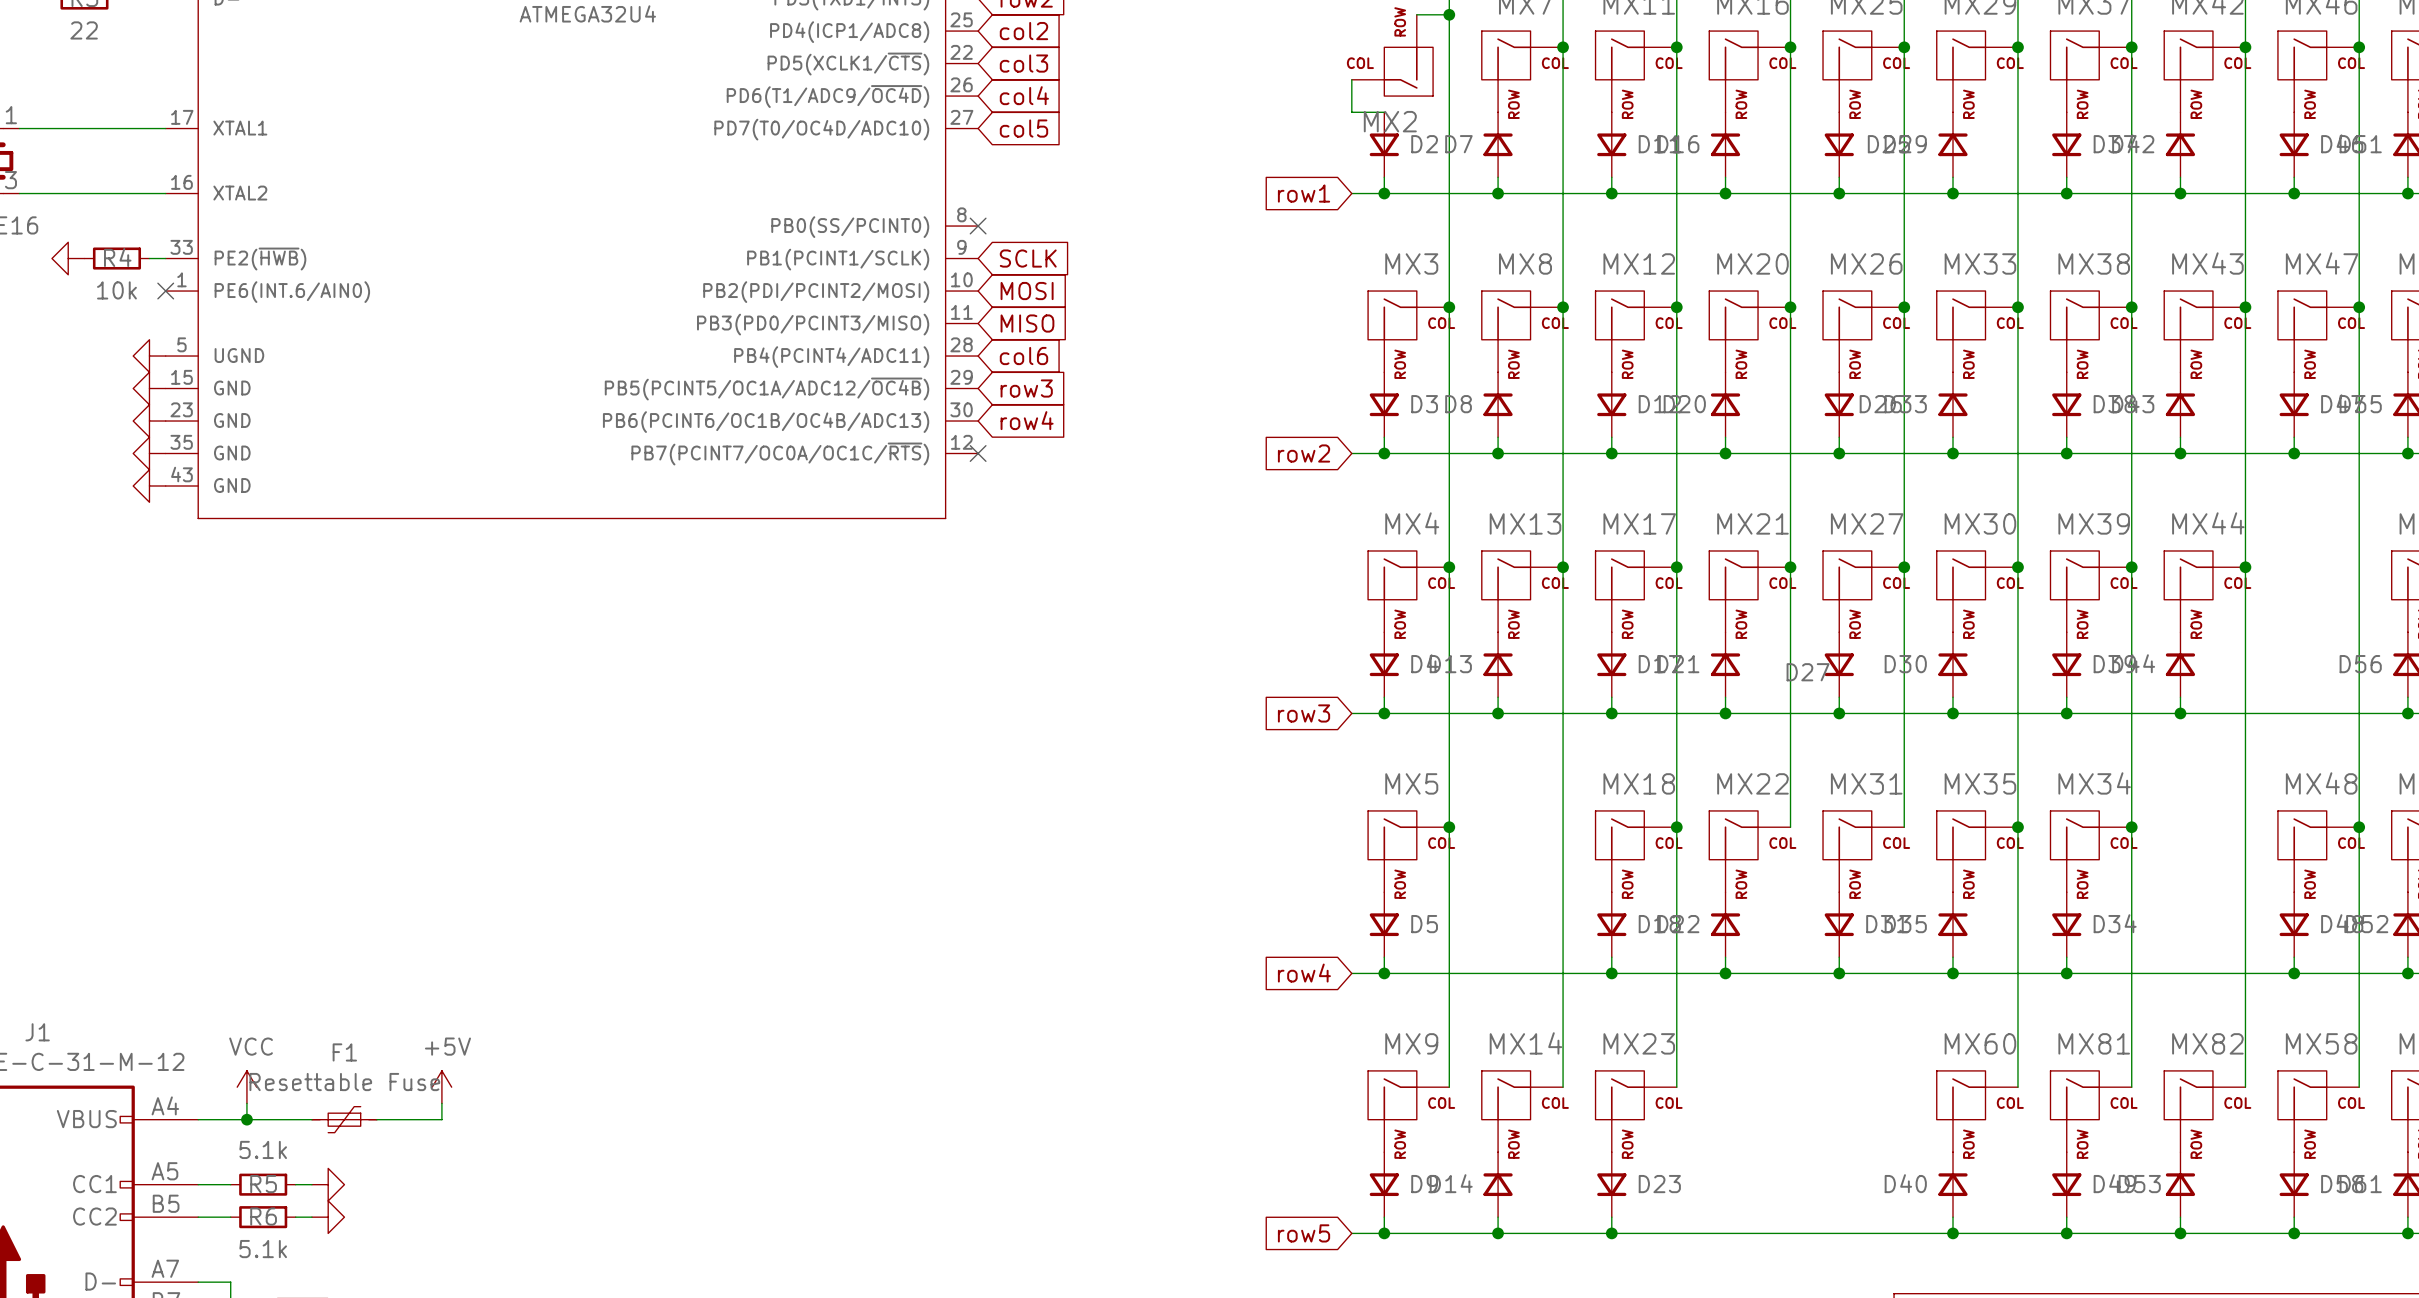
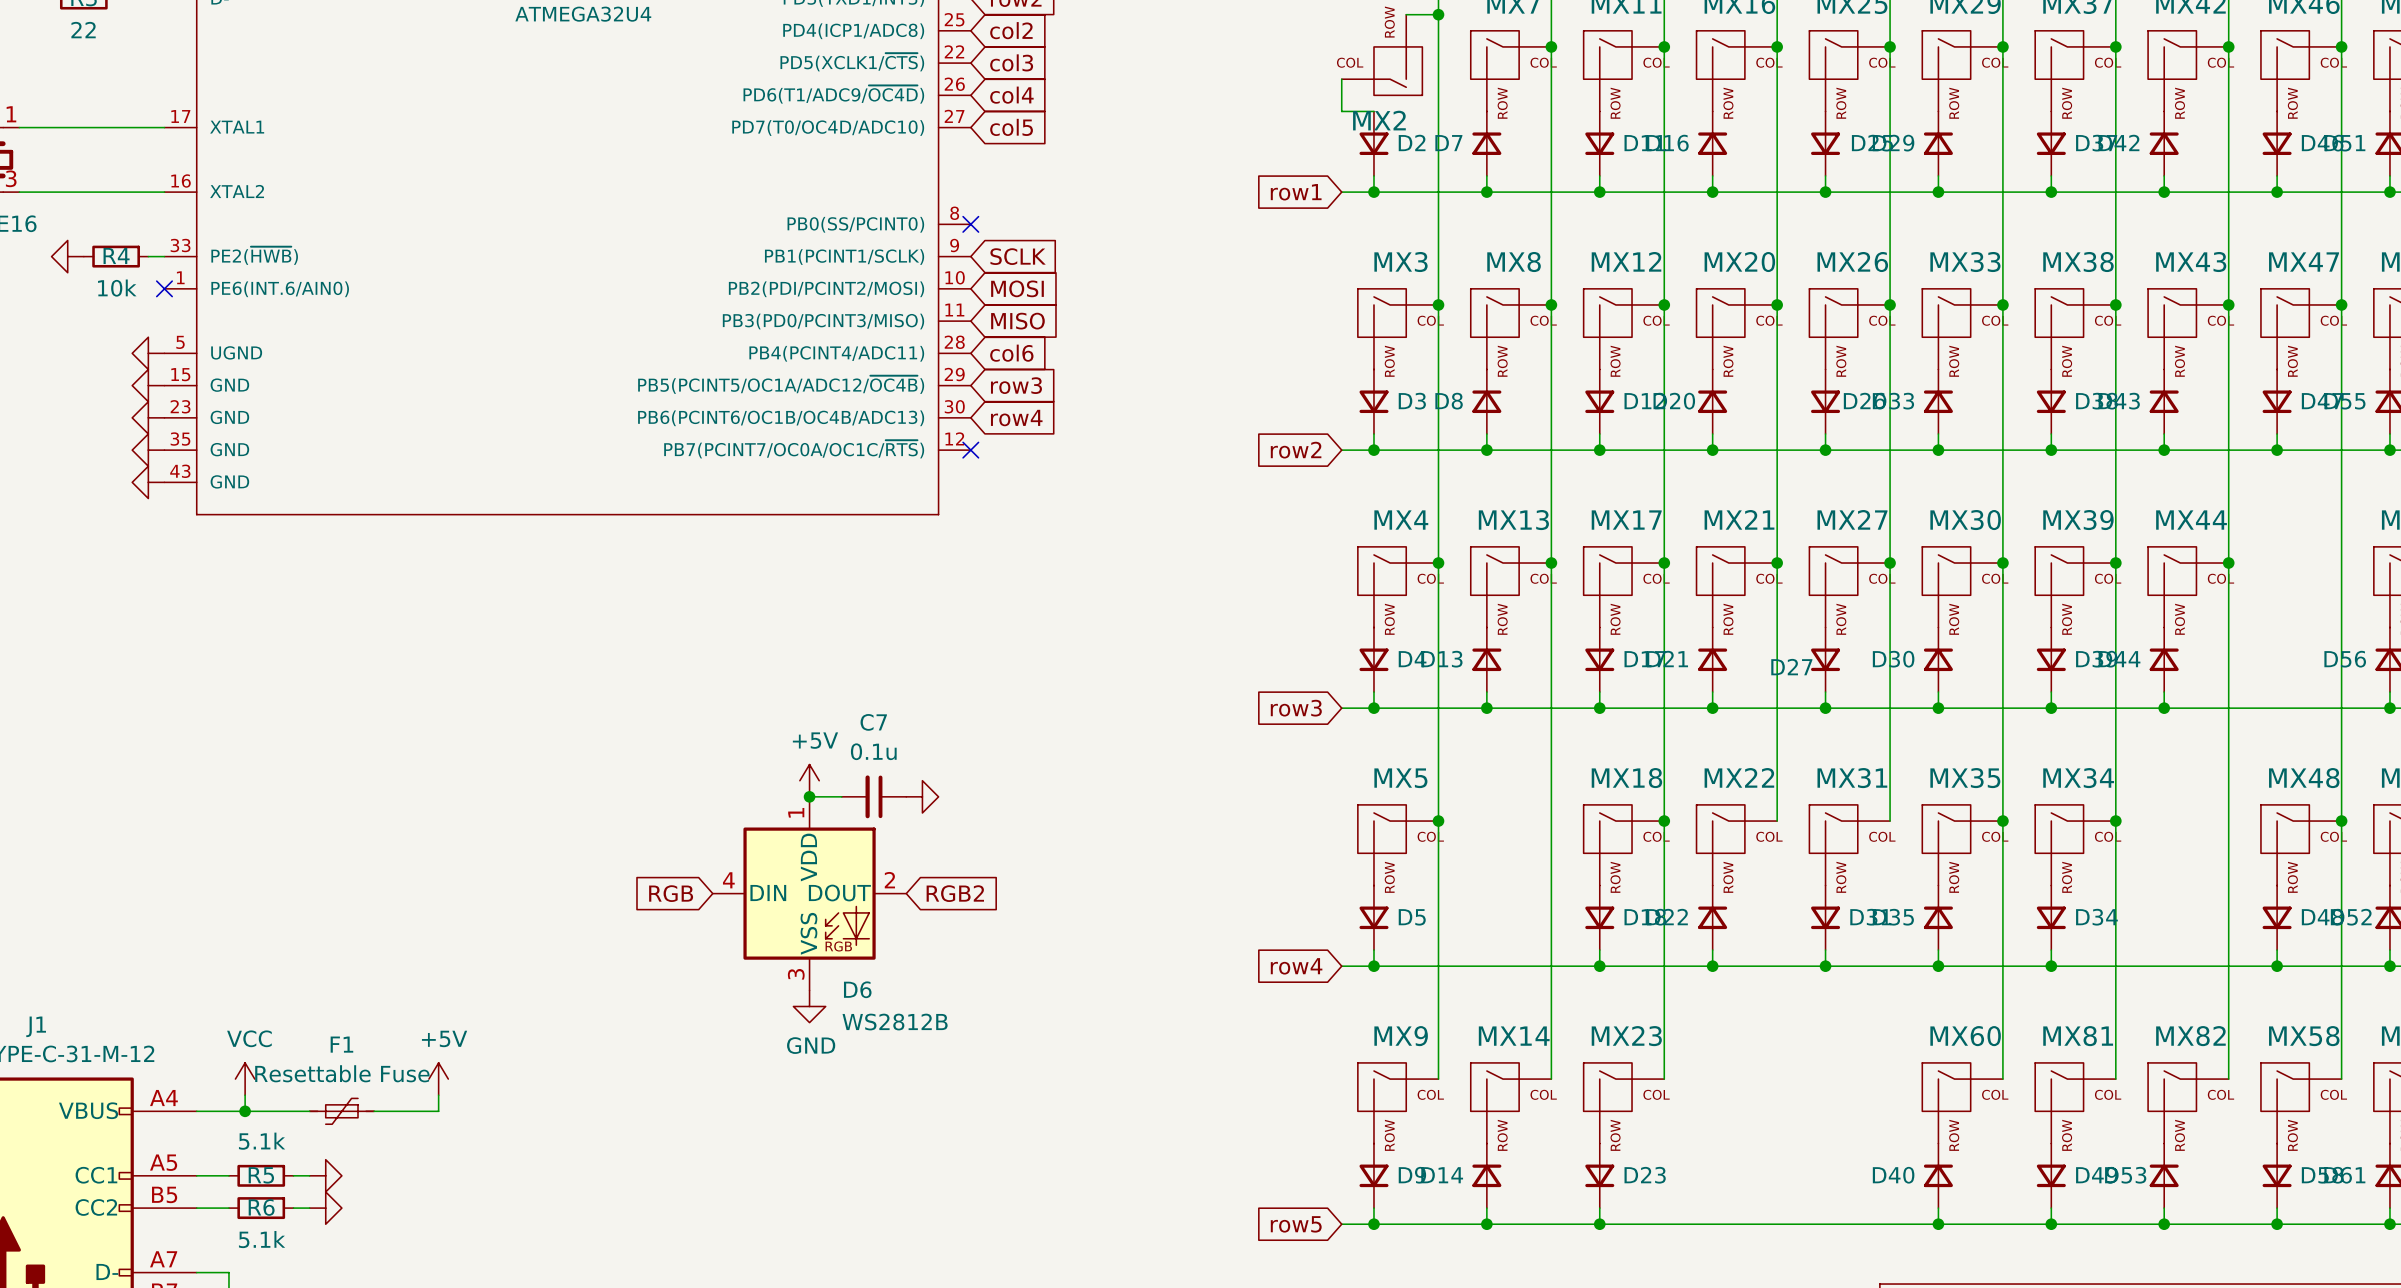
power symbol: none -> +5V (809, 780)
wire: none -> (809, 796) (841, 796)
junction: none -> (809, 796)
C7: none -> 0.1u (874, 796)
power symbol: none -> (922, 796)
global label: none -> RGB (671, 893)
D6: none -> WS2812B (809, 893)
global label: none -> RGB2 (955, 893)
power symbol: none -> GND (809, 1006)

